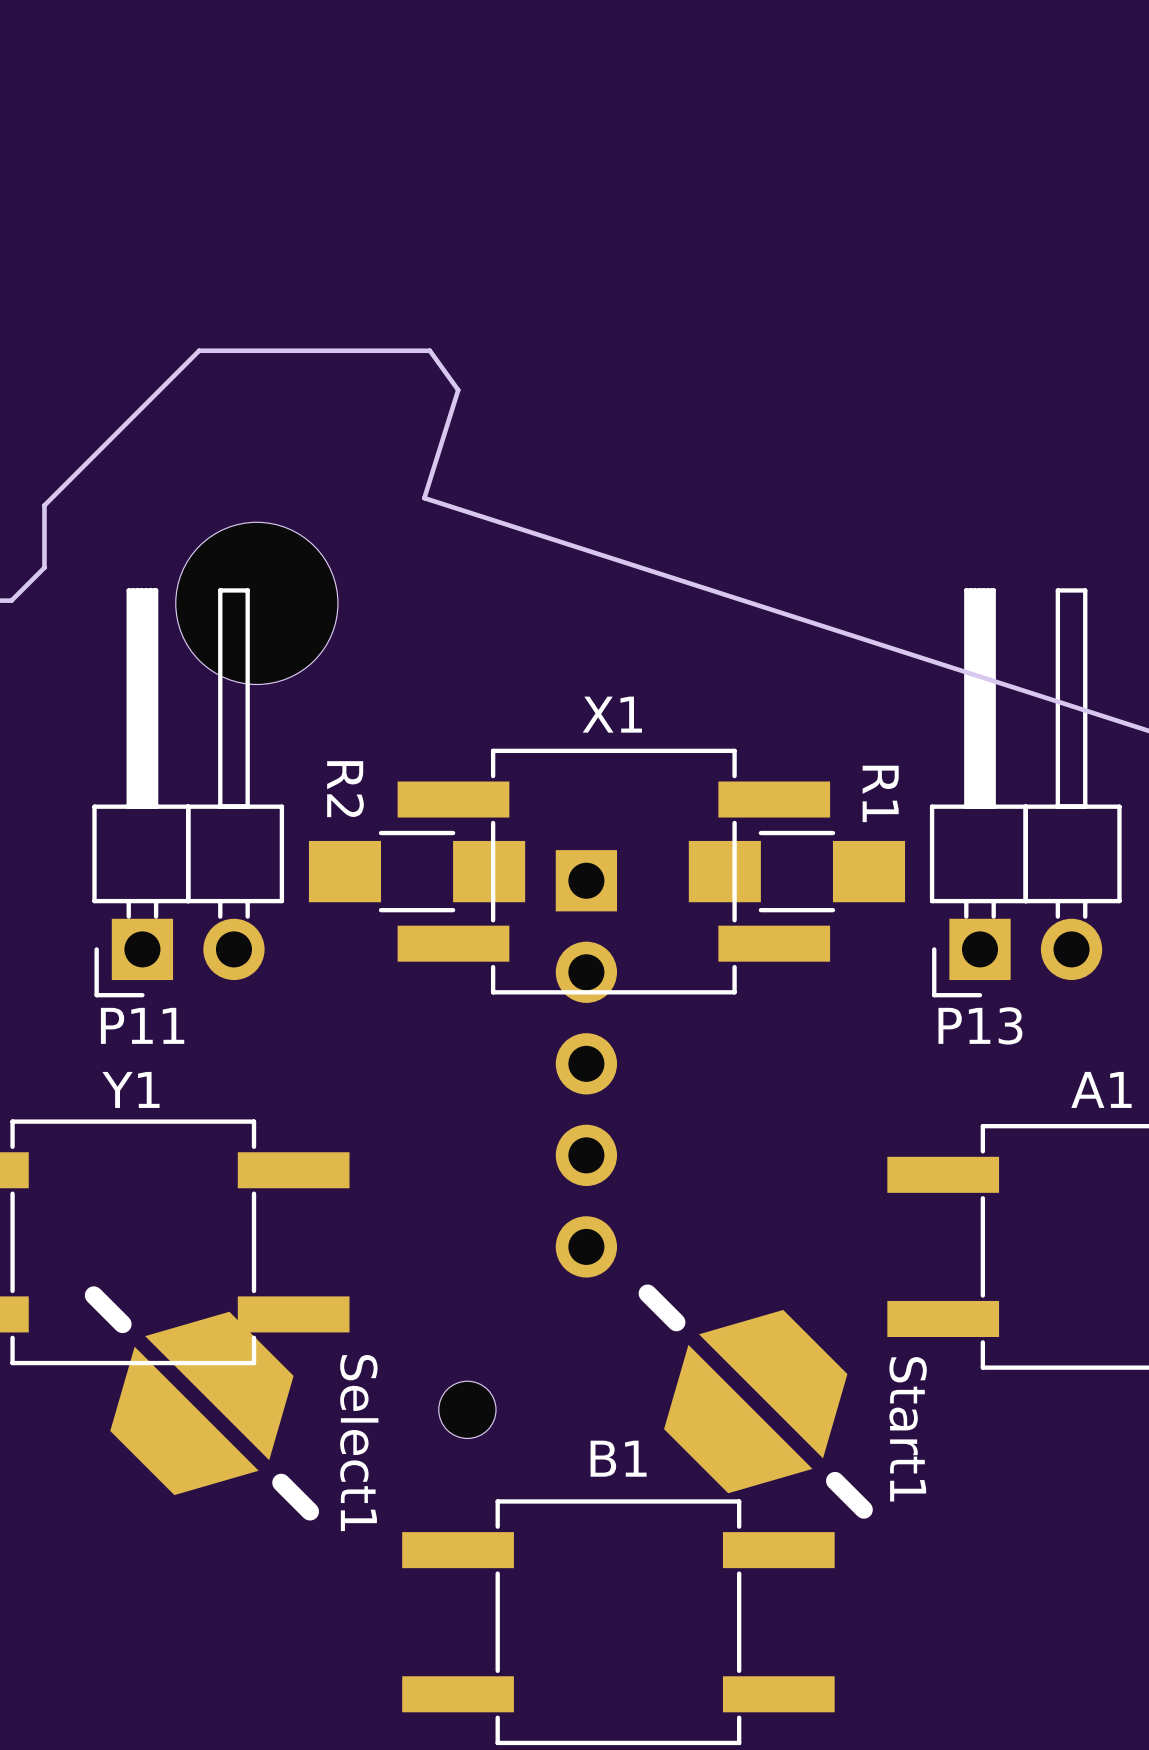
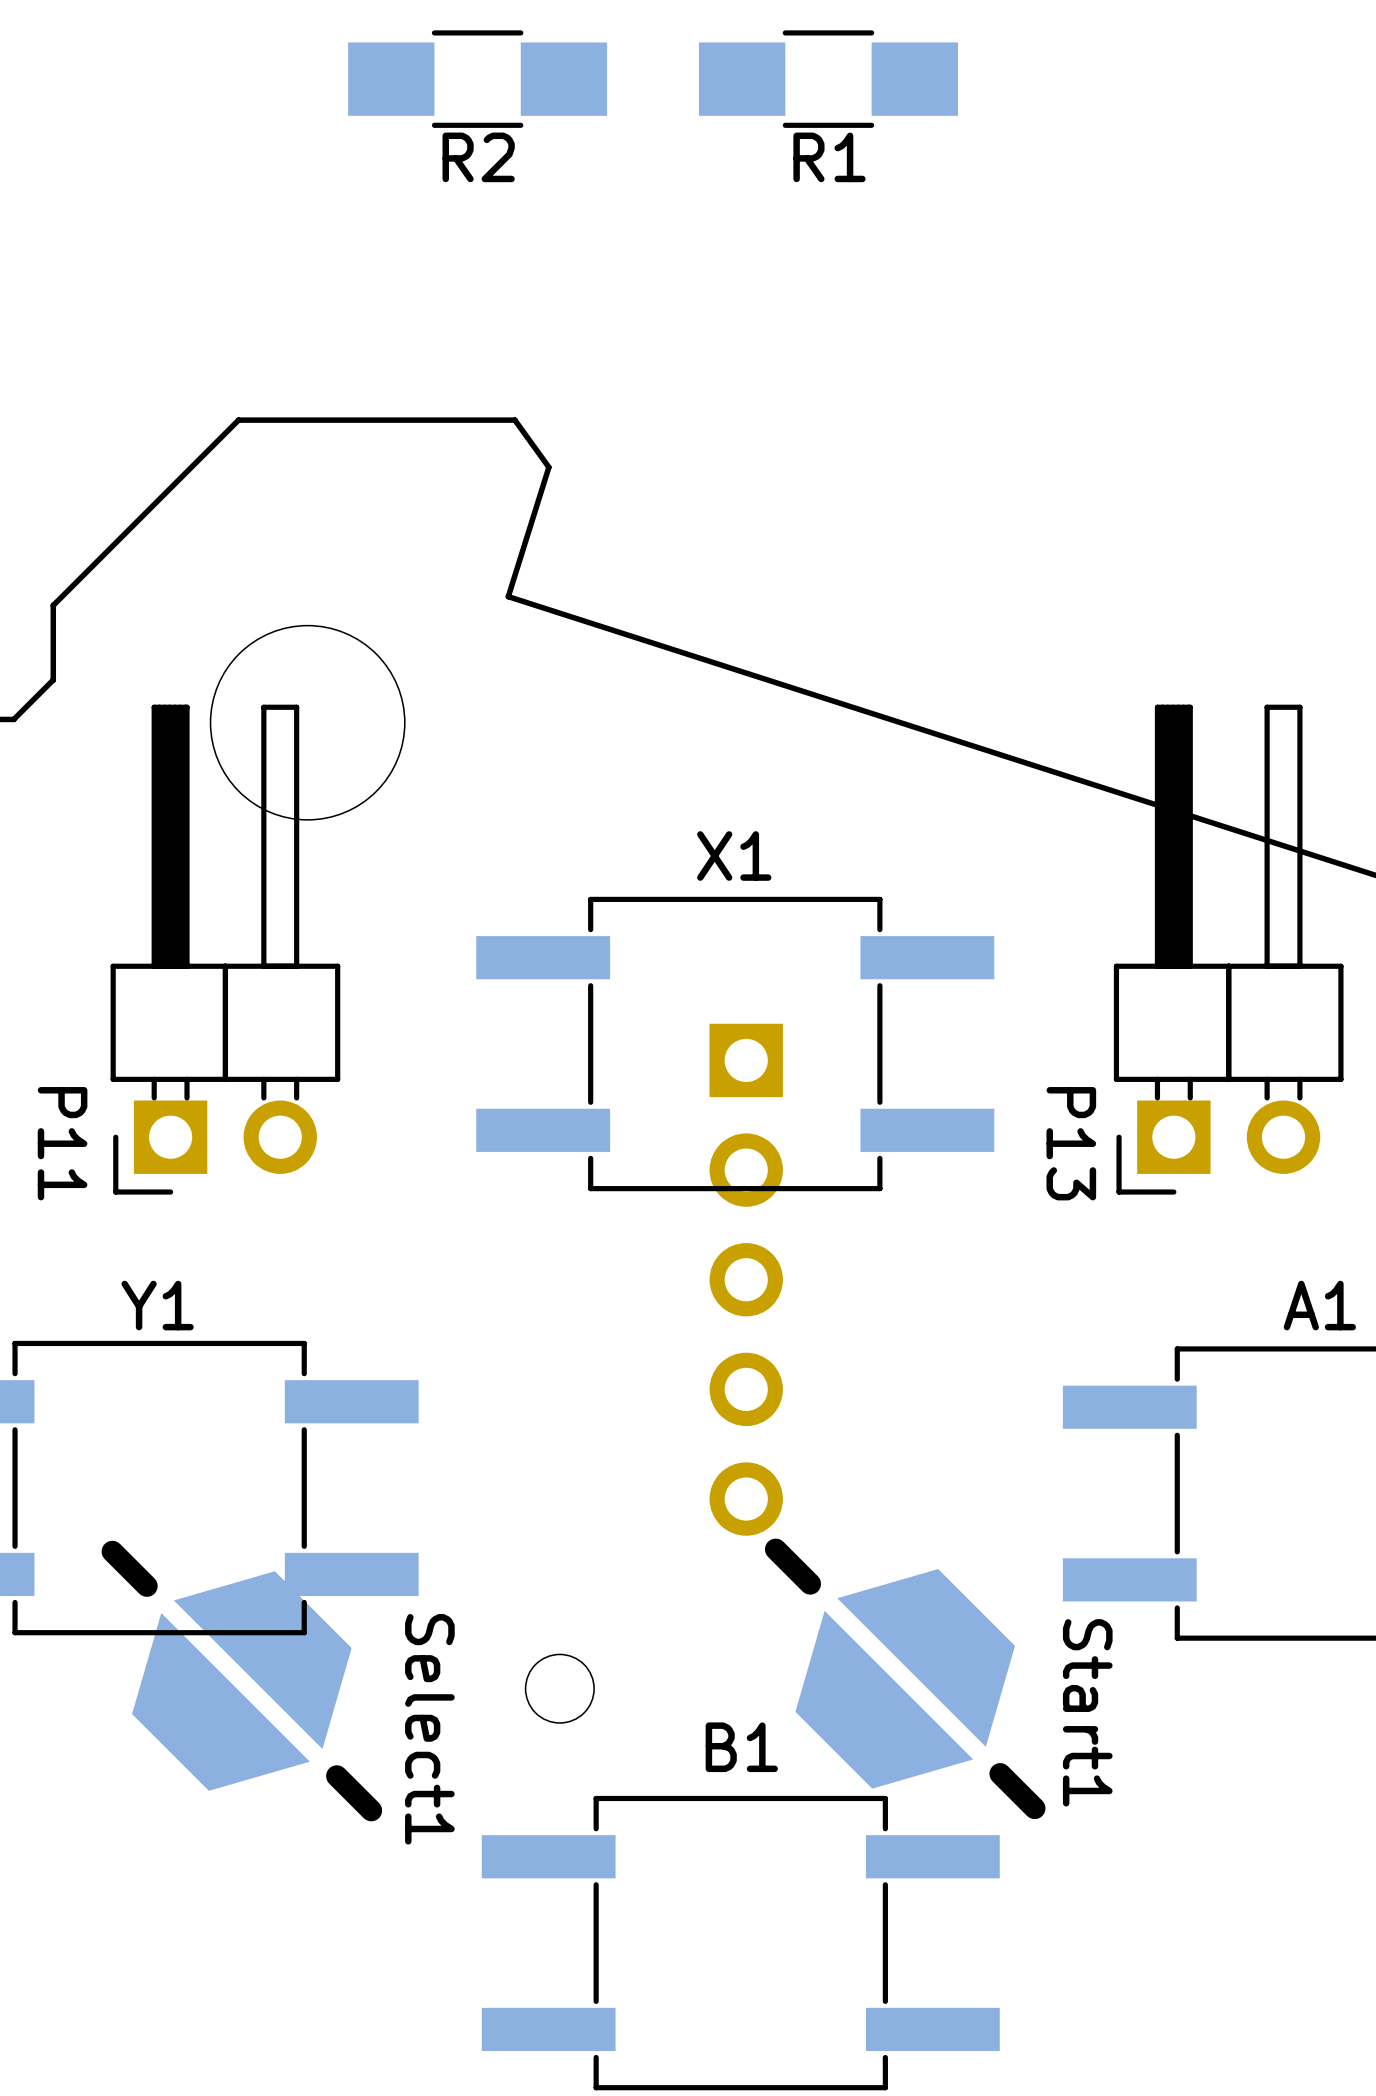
R2 name rotation: 0° (345, 789) -> 90° counterclockwise (478, 157)
R2 name position: R2 (345, 789) -> R2 (478, 157)
R1 name rotation: 0° (880, 793) -> 90° counterclockwise (829, 157)
R1 name position: R1 (880, 793) -> R1 (829, 157)
R2 position: (417, 871) -> (477, 79)
R1 position: (796, 871) -> (828, 79)
P11 name rotation: 0° (142, 1025) -> 90° clockwise (62, 1143)
P13 name rotation: 0° (980, 1025) -> 90° clockwise (1071, 1143)
part position: (586, 1063) -> (746, 1279)

